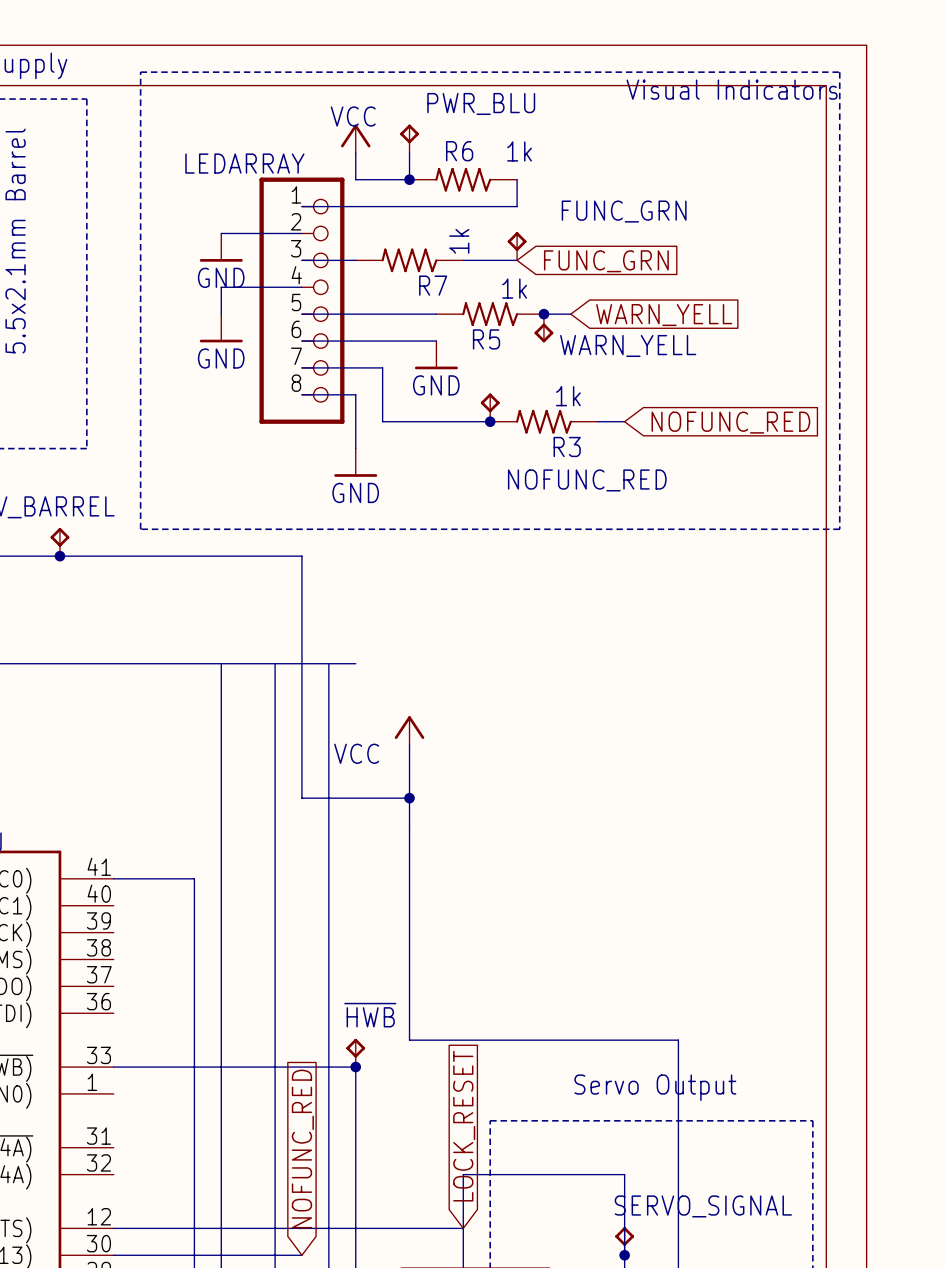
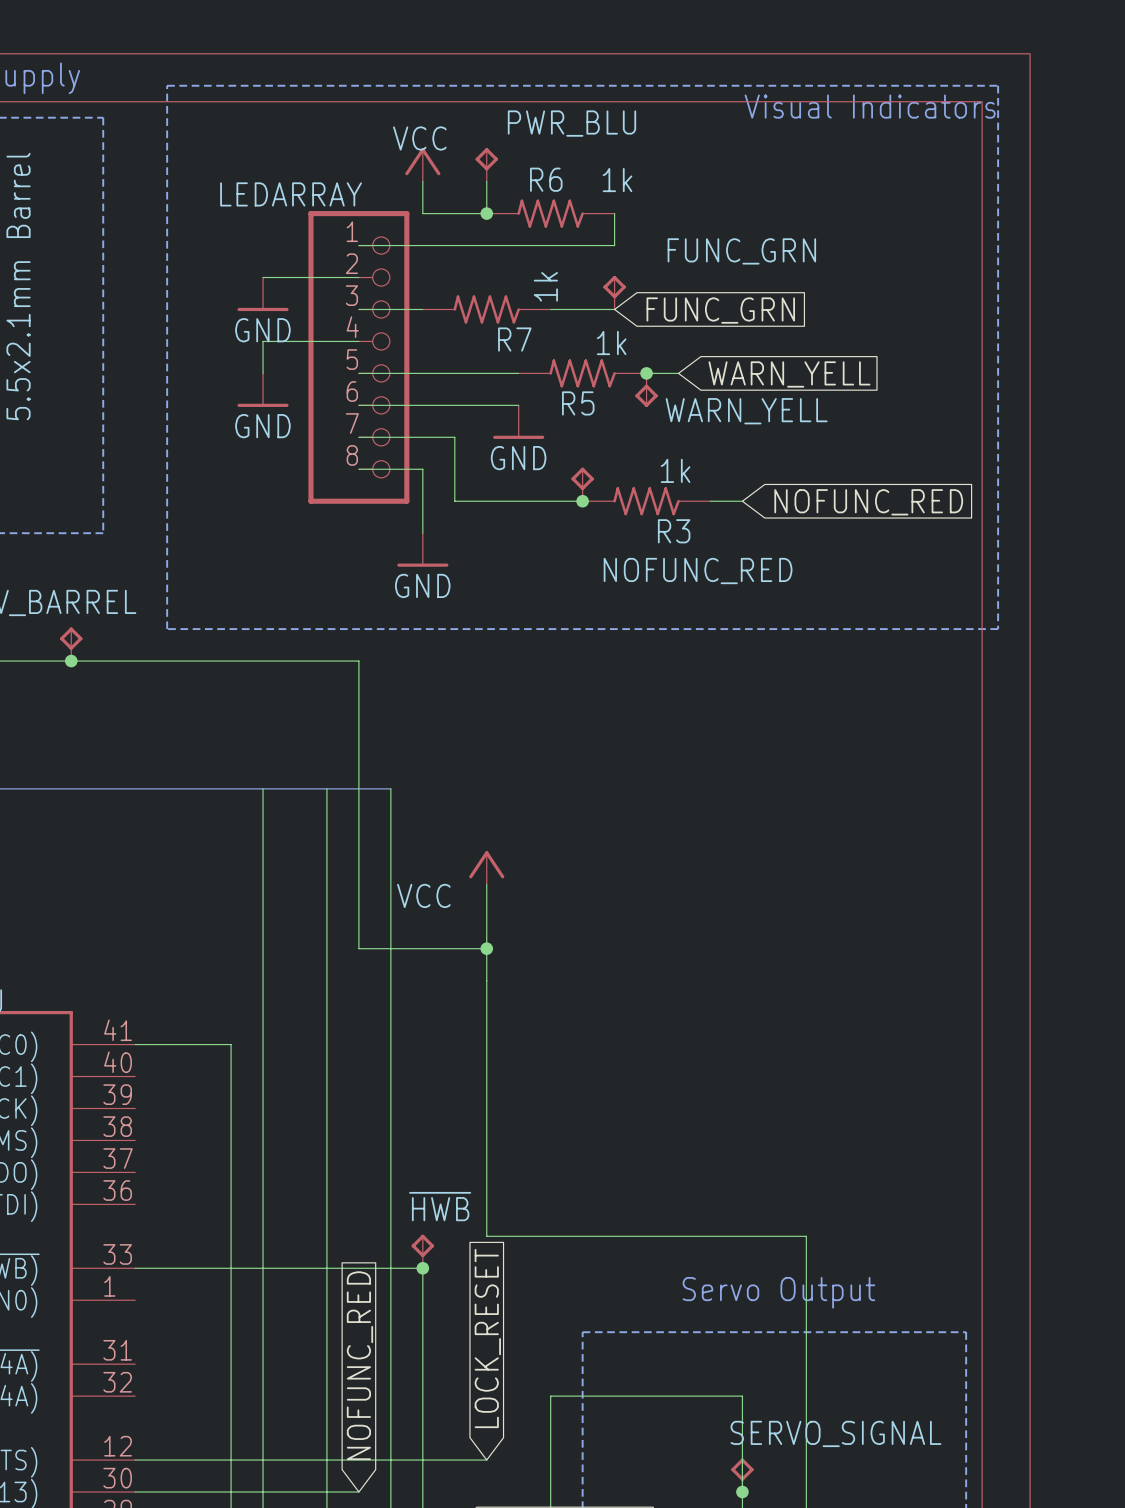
bus: (328, 663) (355, 663) -> none
global label position: LOCK_RESET (464, 1126) -> LOCK_RESET (487, 1338)
wire: (409, 1228) (463, 1228) -> none

